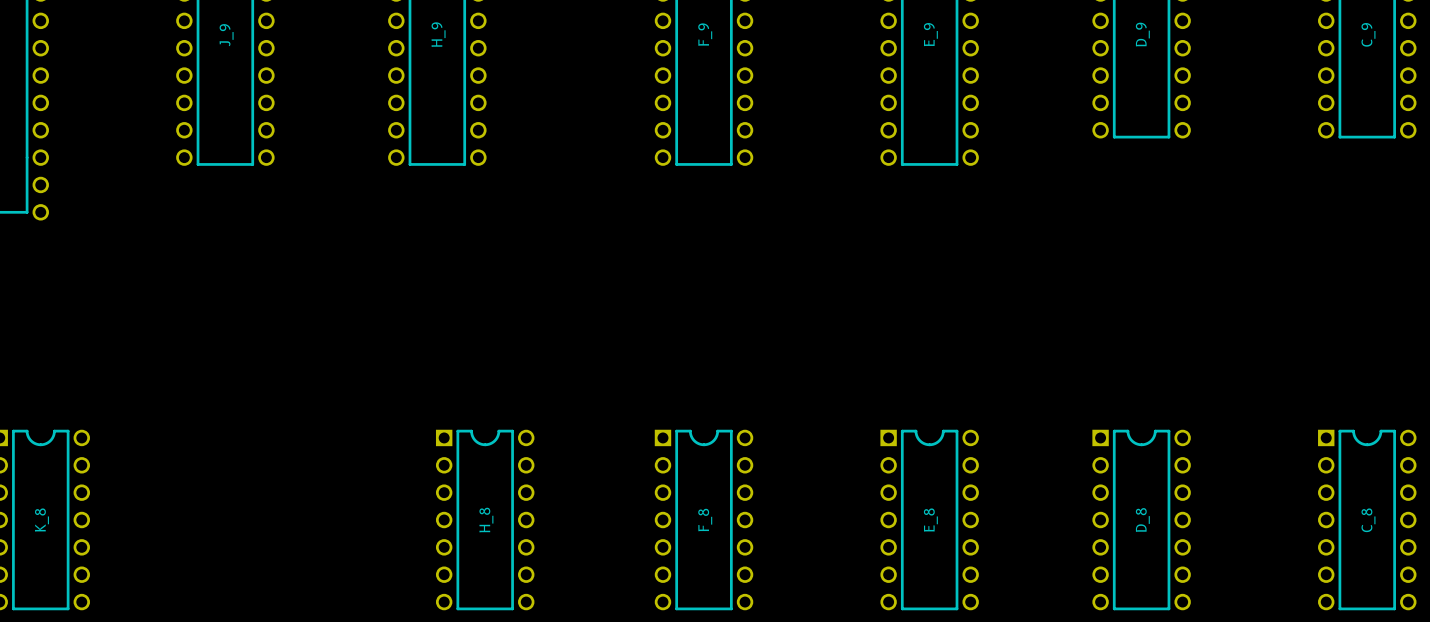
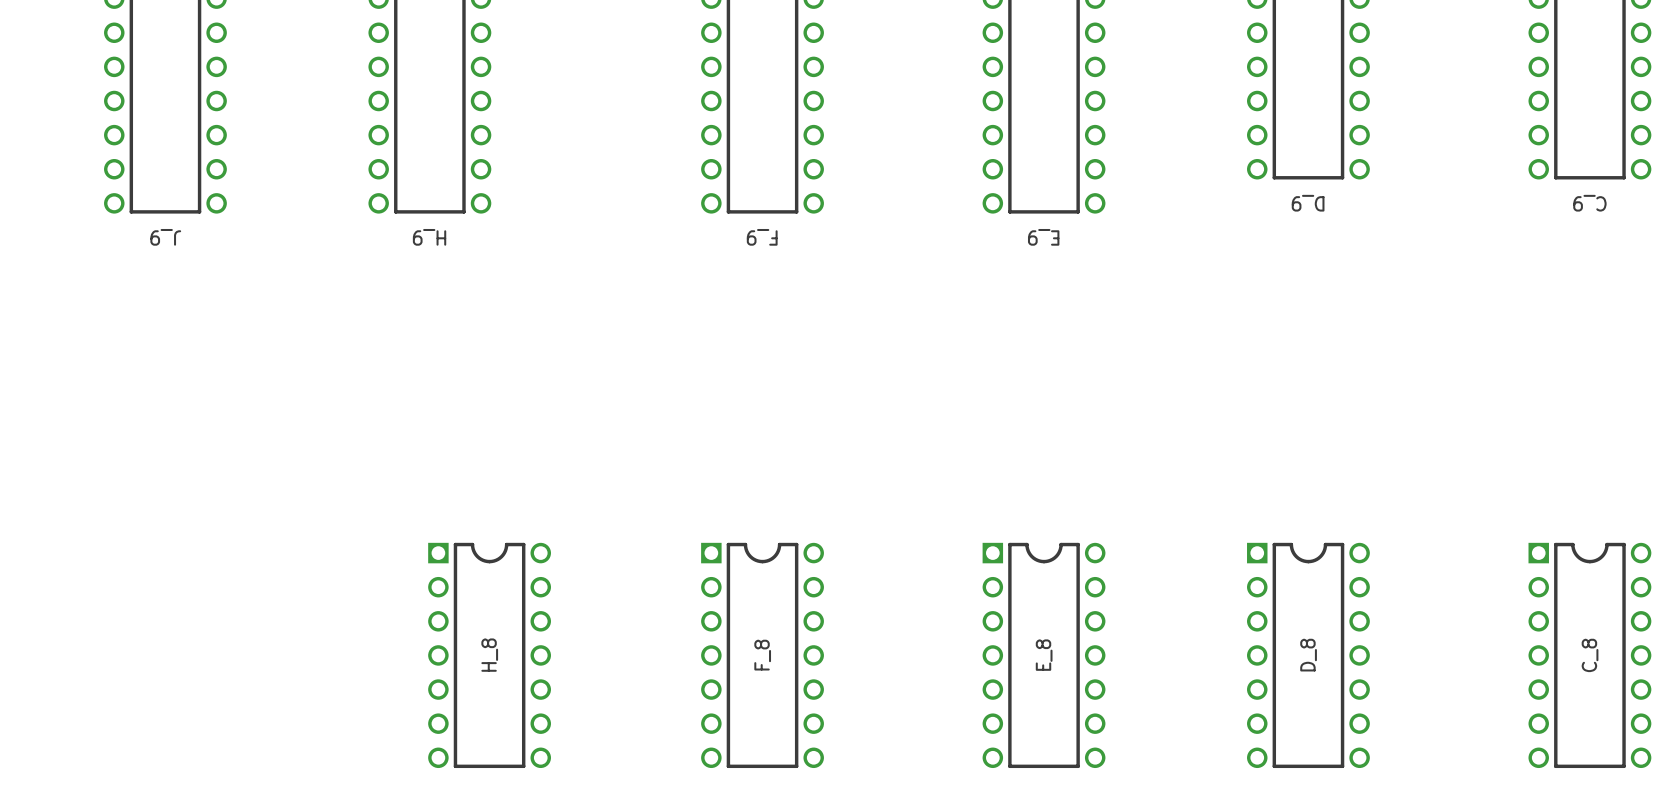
H_9 name rotation: 0° (438, 34) -> 90° counterclockwise (429, 237)
H_9 name position: H_9 (438, 34) -> H_9 (429, 237)
F_9 name rotation: 0° (705, 34) -> 90° counterclockwise (762, 237)
F_9 name position: F_9 (705, 34) -> F_9 (762, 237)
E_9 name rotation: 0° (930, 34) -> 90° counterclockwise (1043, 237)
E_9 name position: E_9 (930, 34) -> E_9 (1043, 237)
D_9 name rotation: 0° (1142, 34) -> 90° counterclockwise (1308, 203)
D_9 name position: D_9 (1142, 34) -> D_9 (1308, 203)
C_9 name rotation: 0° (1368, 34) -> 90° counterclockwise (1589, 203)
C_9 name position: C_9 (1368, 34) -> C_9 (1589, 203)
J_9 name rotation: 0° (226, 35) -> 90° counterclockwise (165, 237)
J_9 name position: J_9 (226, 35) -> J_9 (165, 237)

